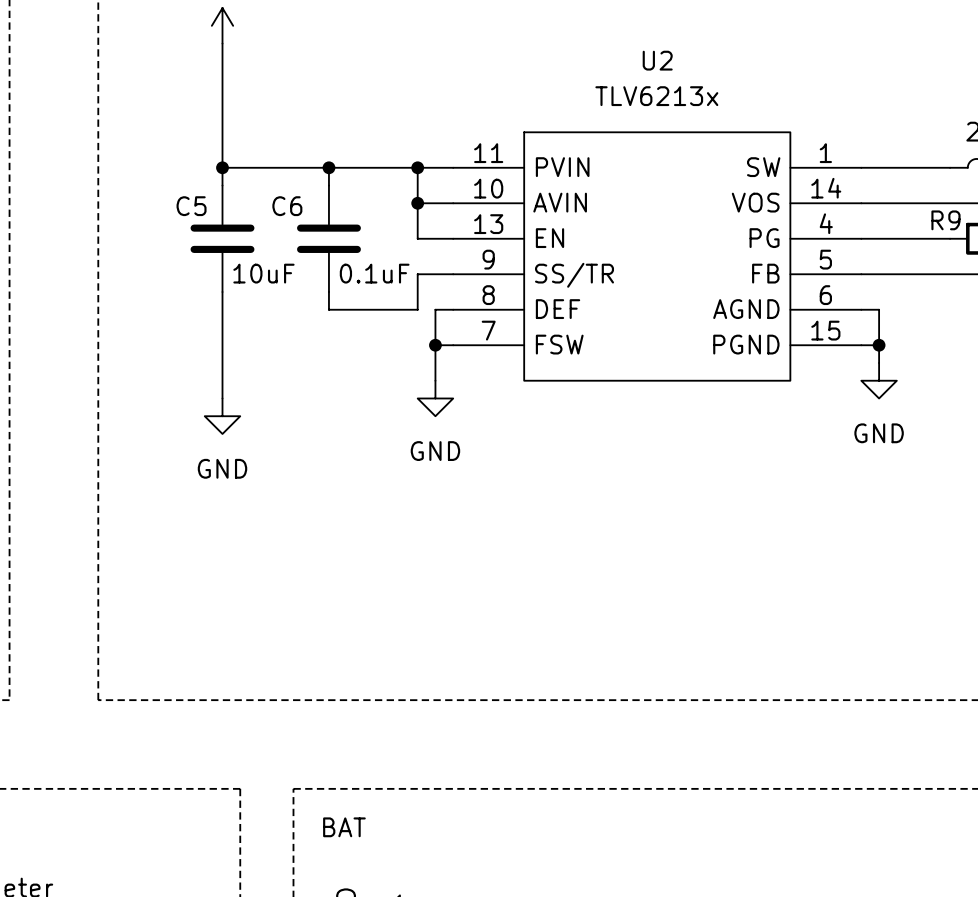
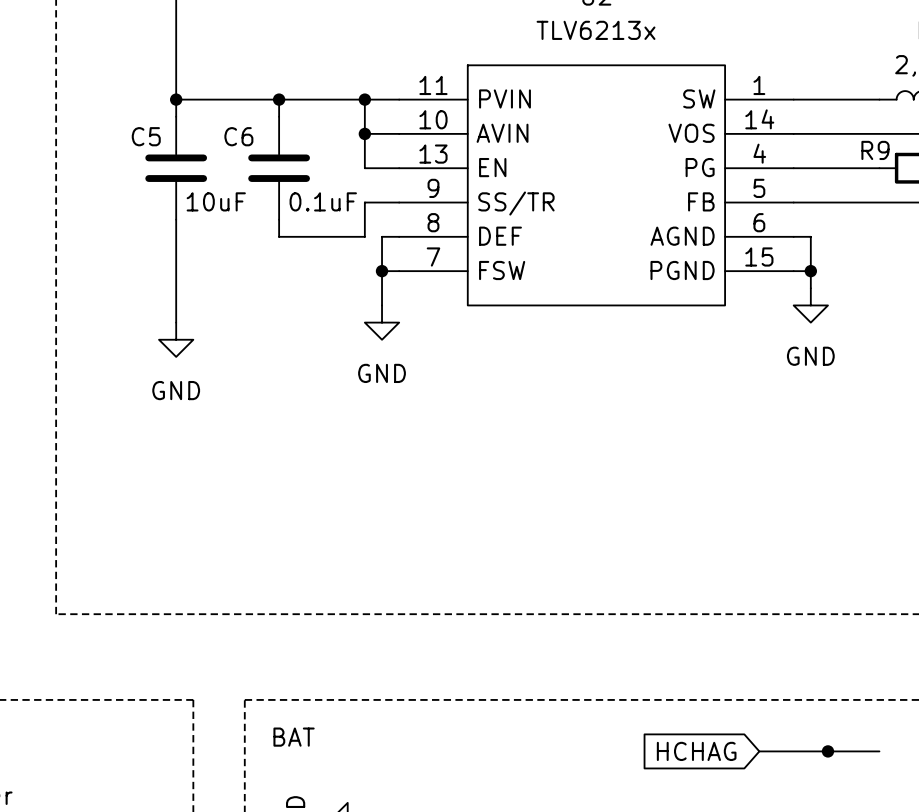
global label: none -> HCHAG (696, 751)
wire: none -> (759, 751) (879, 751)
junction: none -> (827, 751)

